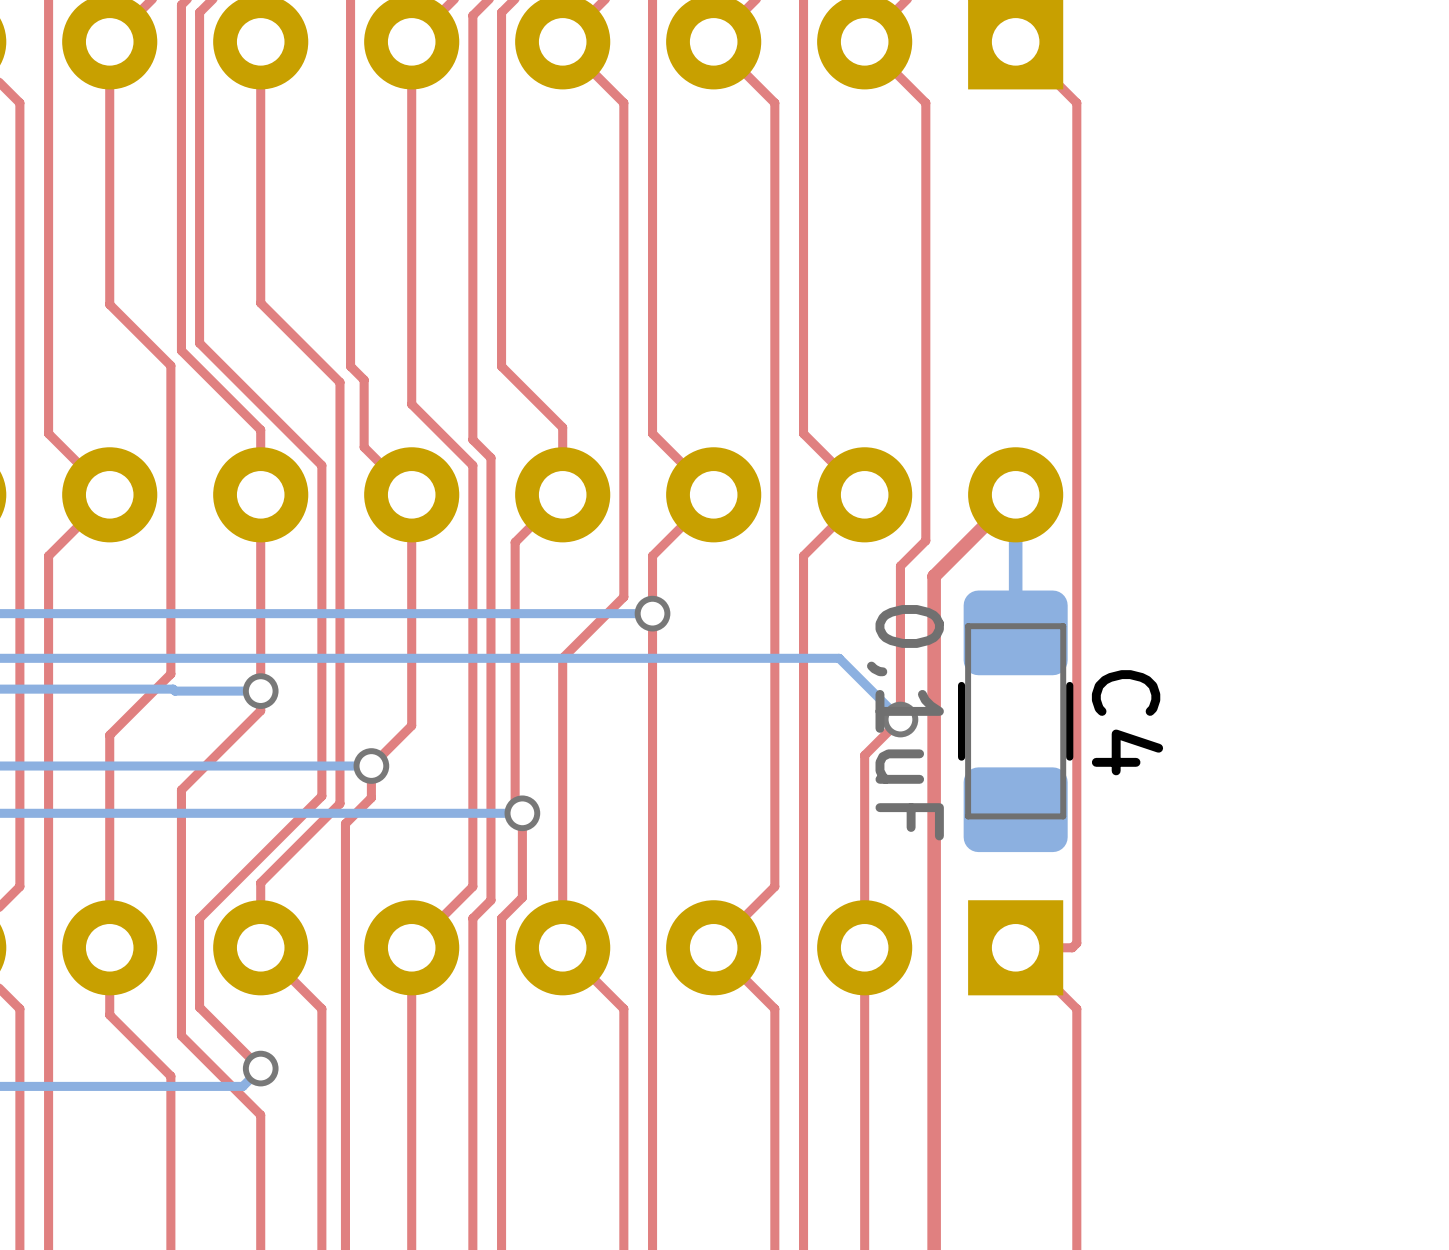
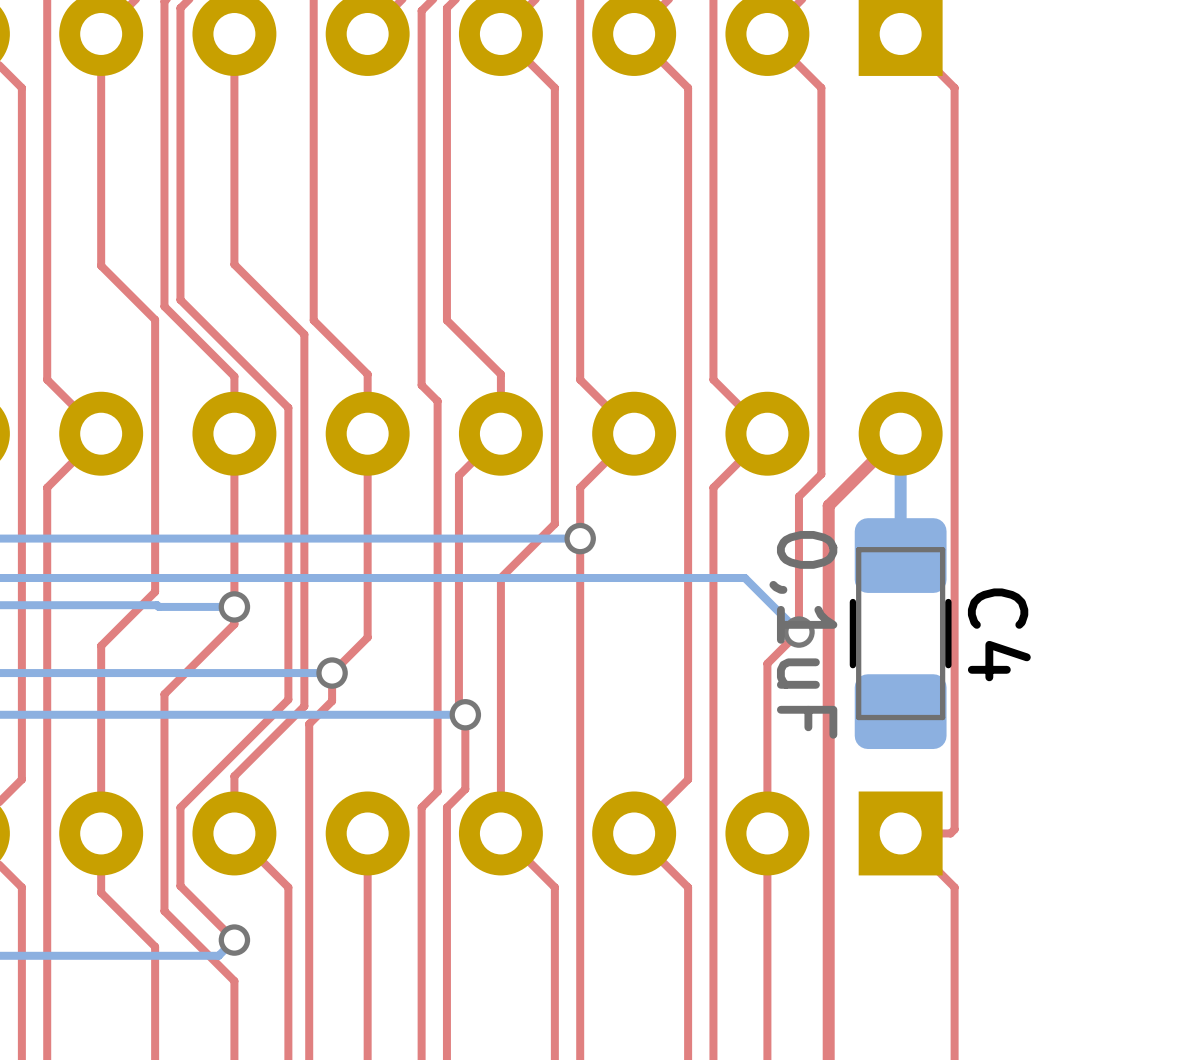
top track: (411, 41) (411, 404) (472, 465) (472, 886) (411, 947) -> none
top track: (364, 380) (364, 447) (411, 494) -> (325, 332) (367, 374) (367, 433)

